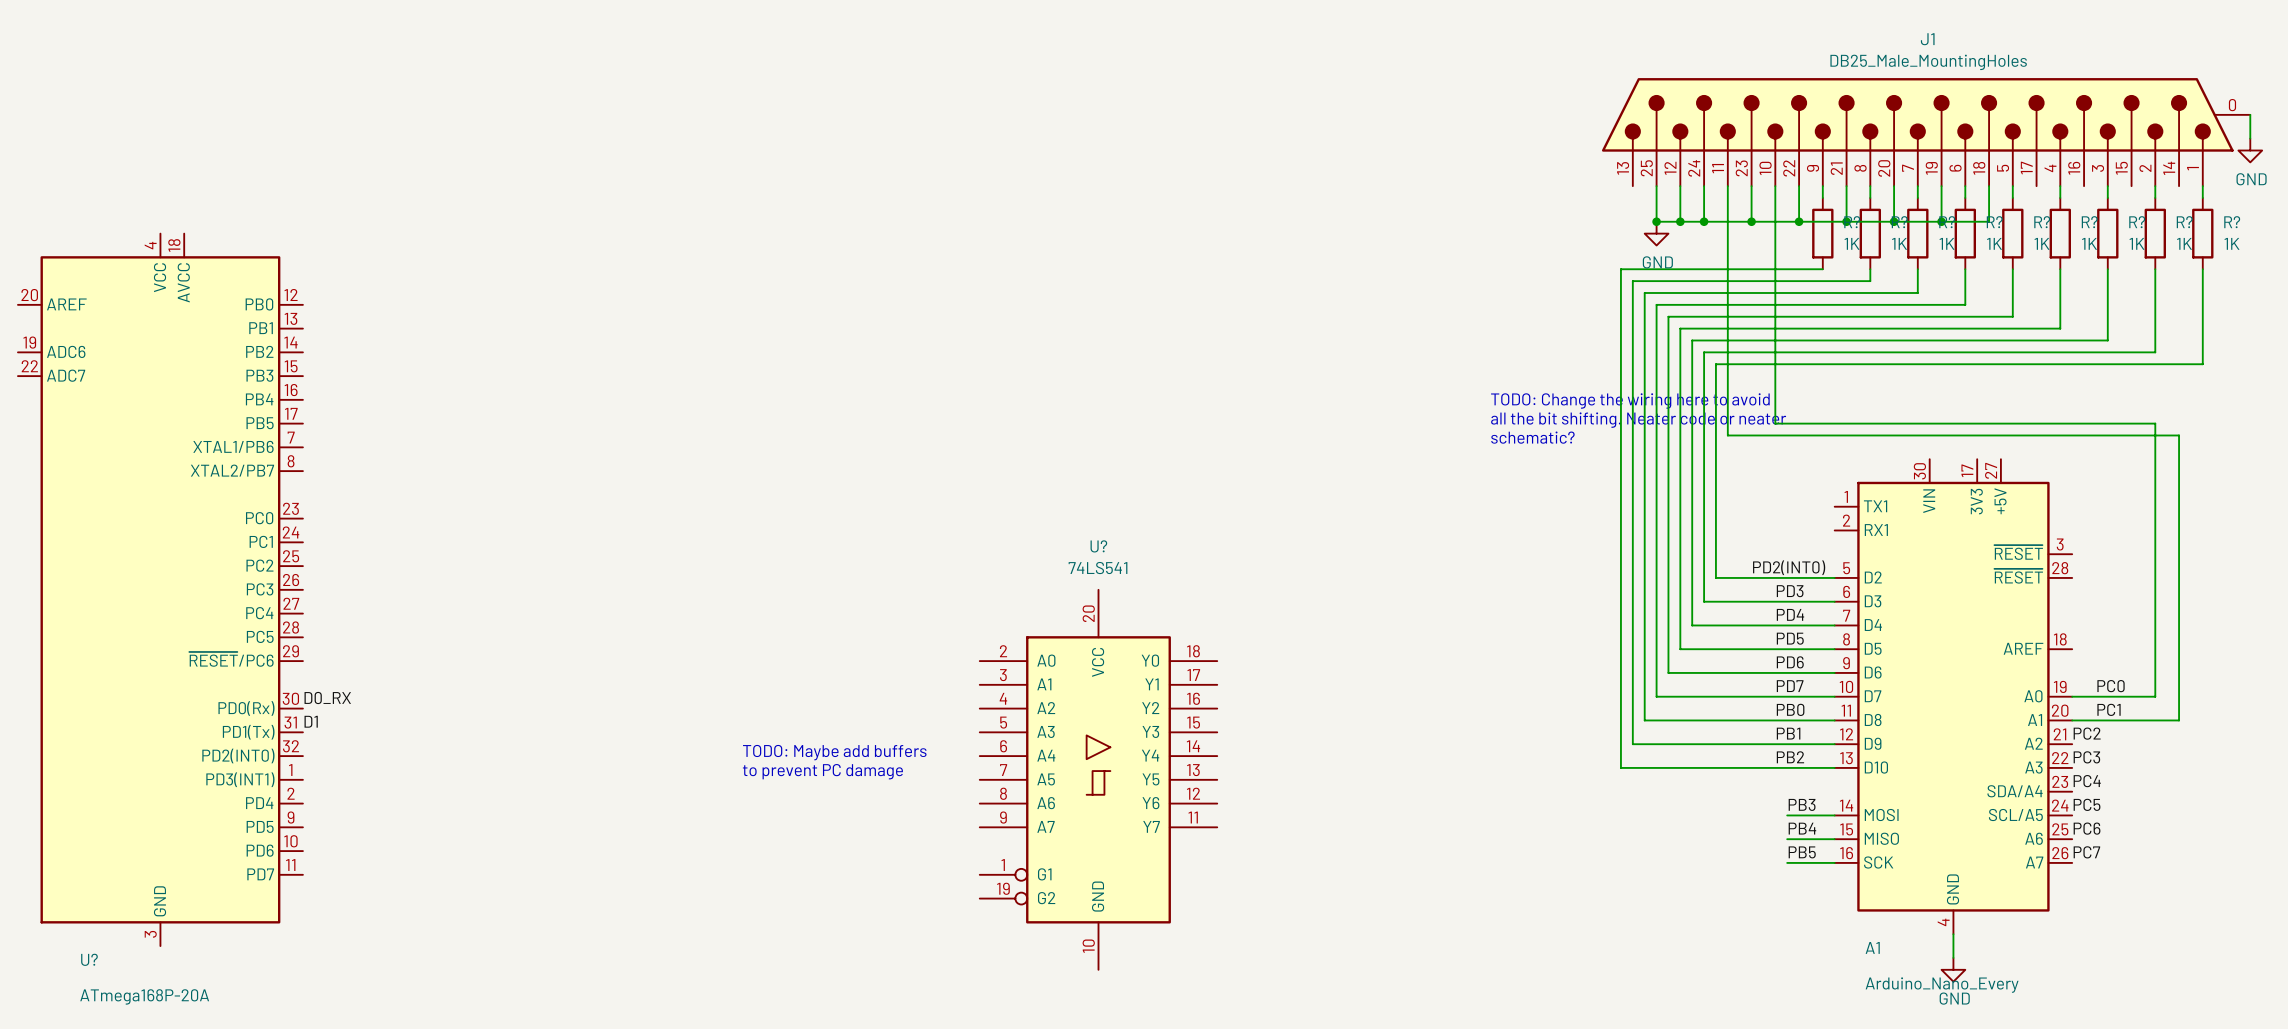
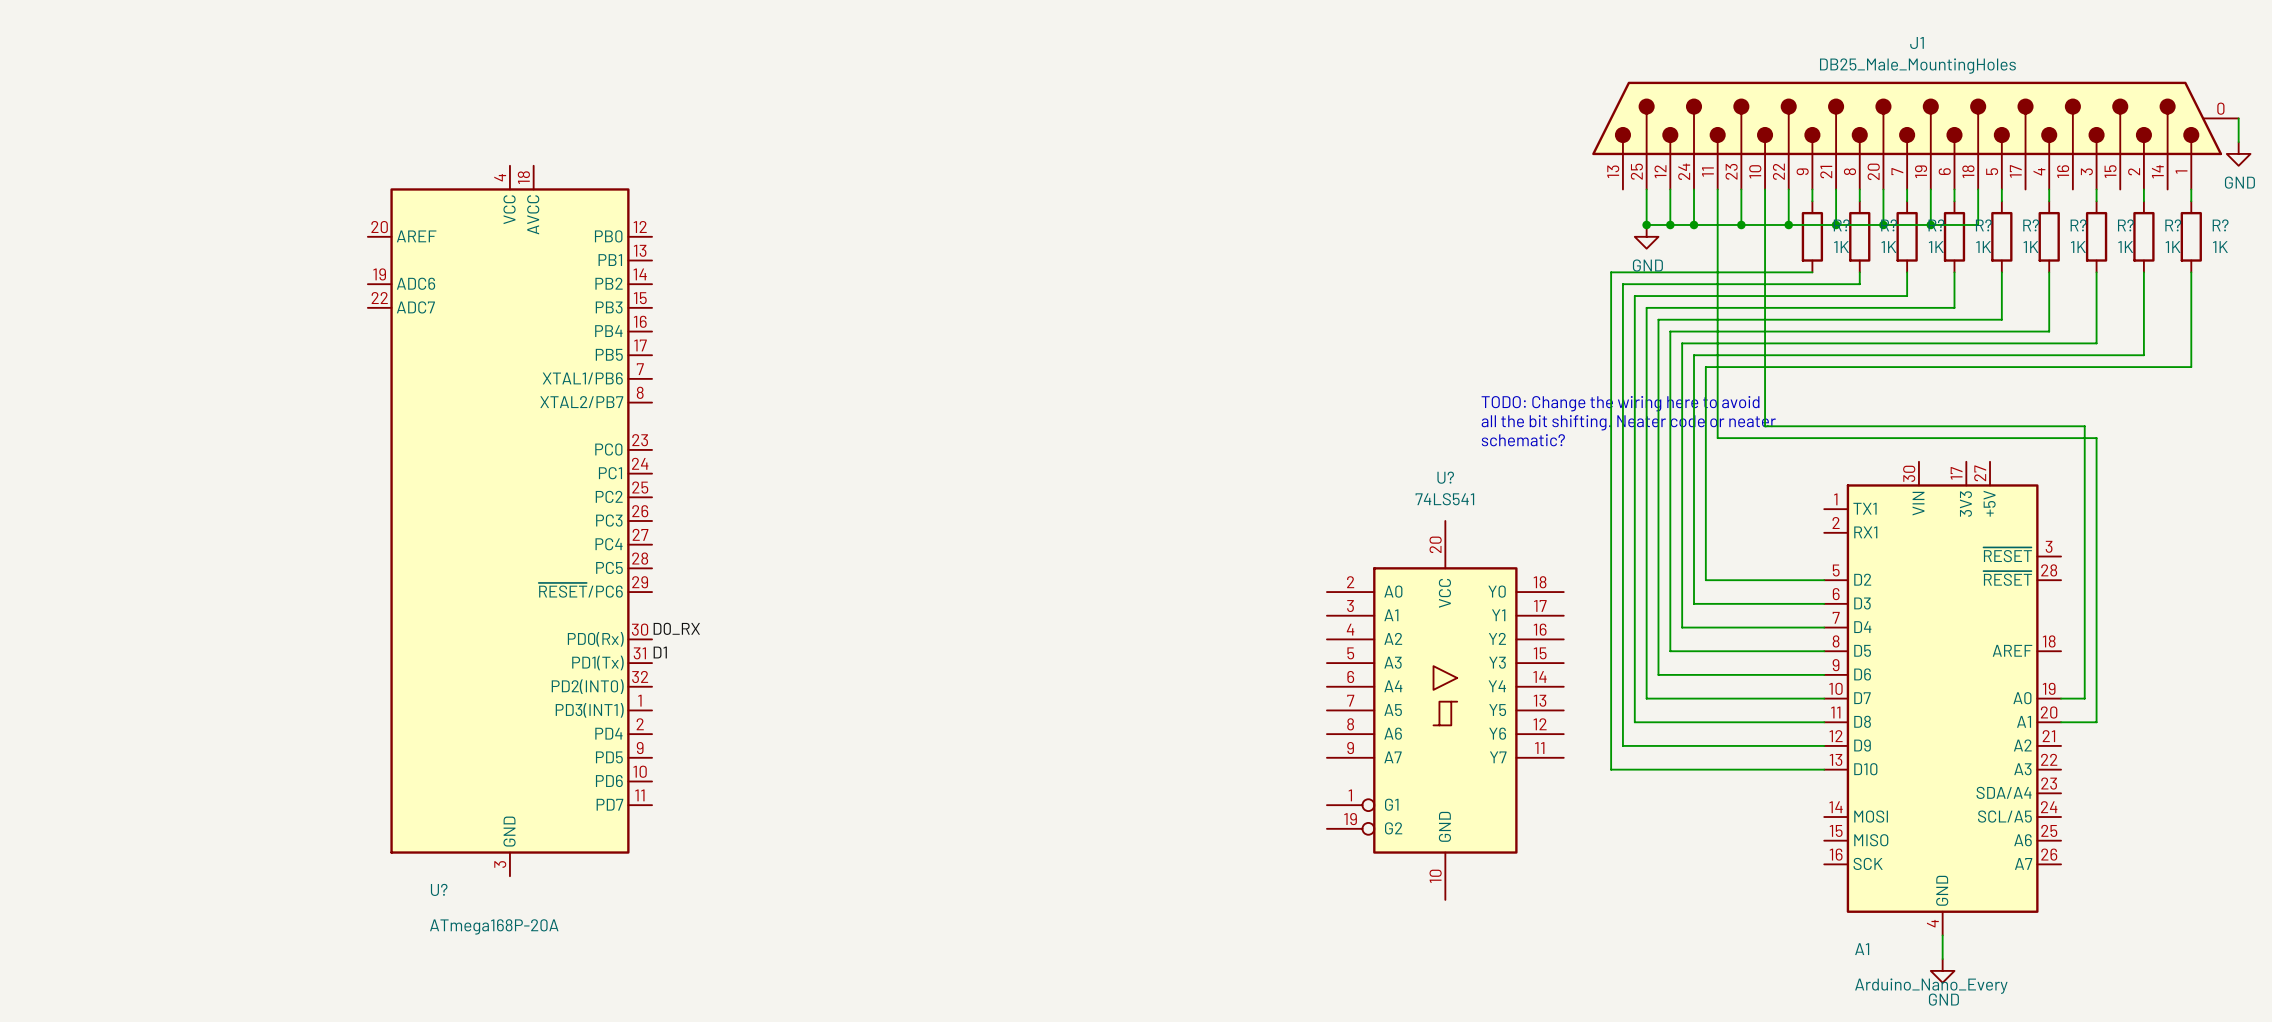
wire: (2095, 423) (2155, 423) (2155, 696) (2095, 696) -> (2084, 426) (2084, 698)
wire: (2107, 435) (2179, 435) (2179, 720) (2107, 720) -> (2096, 438) (2096, 722)
U?: none -> ATmega168P-20A (509, 520)
label: PD2(INT0) (1789, 567) -> none
U?: ATmega168P-20A (160, 589) -> none
label: PD3 (1790, 591) -> none
label: PD4 (1790, 614) -> none
label: none -> D0_RX (676, 628)
label: PD5 (1790, 638) -> none
label: none -> D1 (660, 652)
label: PD6 (1790, 662) -> none
label: PD7 (1790, 686) -> none
label: PC0 (2111, 686) -> none
label: D0_RX (327, 697) -> none
U?: none -> 74LS541 (1445, 710)
label: PB0 (1790, 709) -> none
label: PC1 (2109, 709) -> none
label: D1 (311, 721) -> none
label: PB1 (1788, 733) -> none
label: PC2 (2087, 733) -> none
text: TODO: Maybe add buffers (834, 752) -> none
label: PB2 (1790, 757) -> none
label: PC3 (2086, 757) -> none
text: to prevent PC damage (822, 771) -> none
U?: 74LS541 (1098, 779) -> none
label: PC4 (2087, 781) -> none
label: PB3 (1802, 804) -> none
label: PC5 (2087, 804) -> none
wire: (1787, 815) (1834, 815) -> none
label: PB4 (1802, 828) -> none
label: PC6 (2087, 828) -> none
wire: (1787, 839) (1834, 839) -> none
label: PB5 (1802, 852) -> none
label: PC7 (2086, 852) -> none
wire: (1787, 862) (1834, 862) -> none

